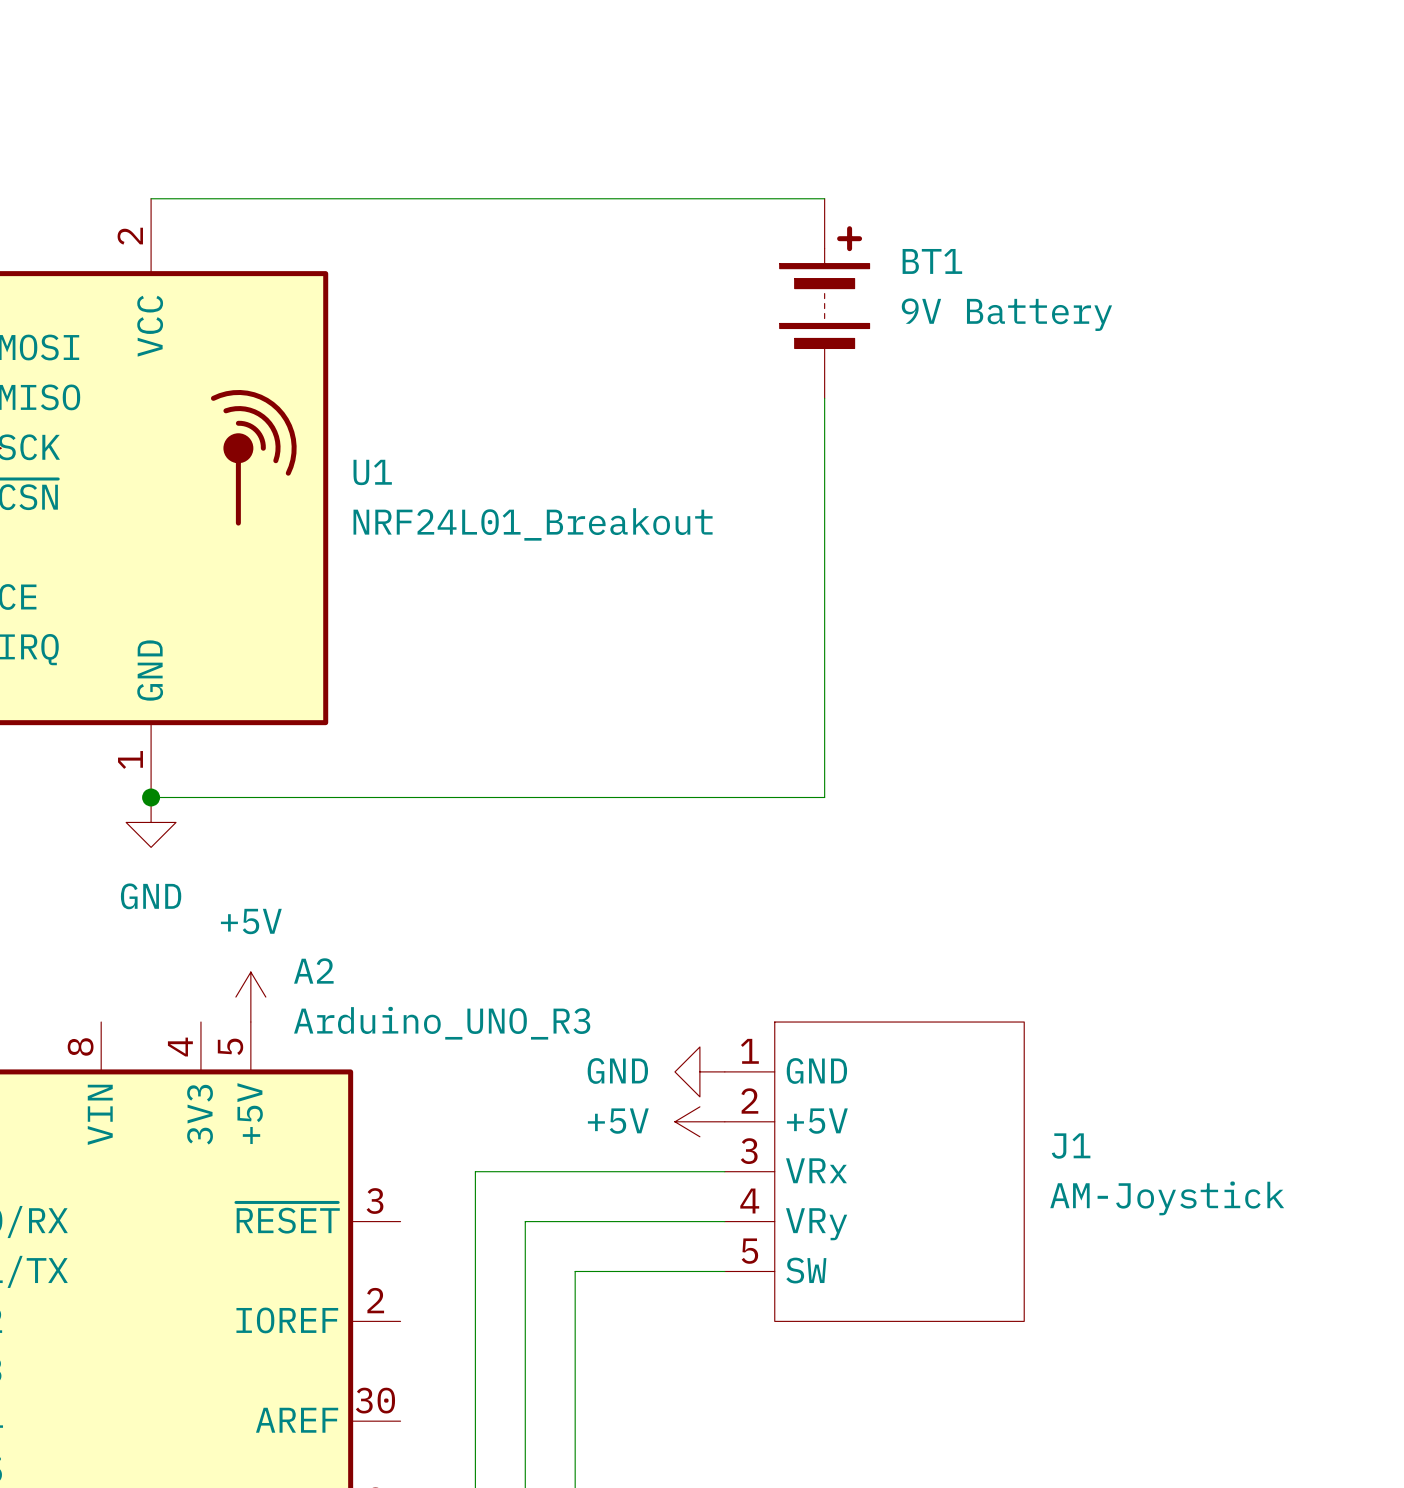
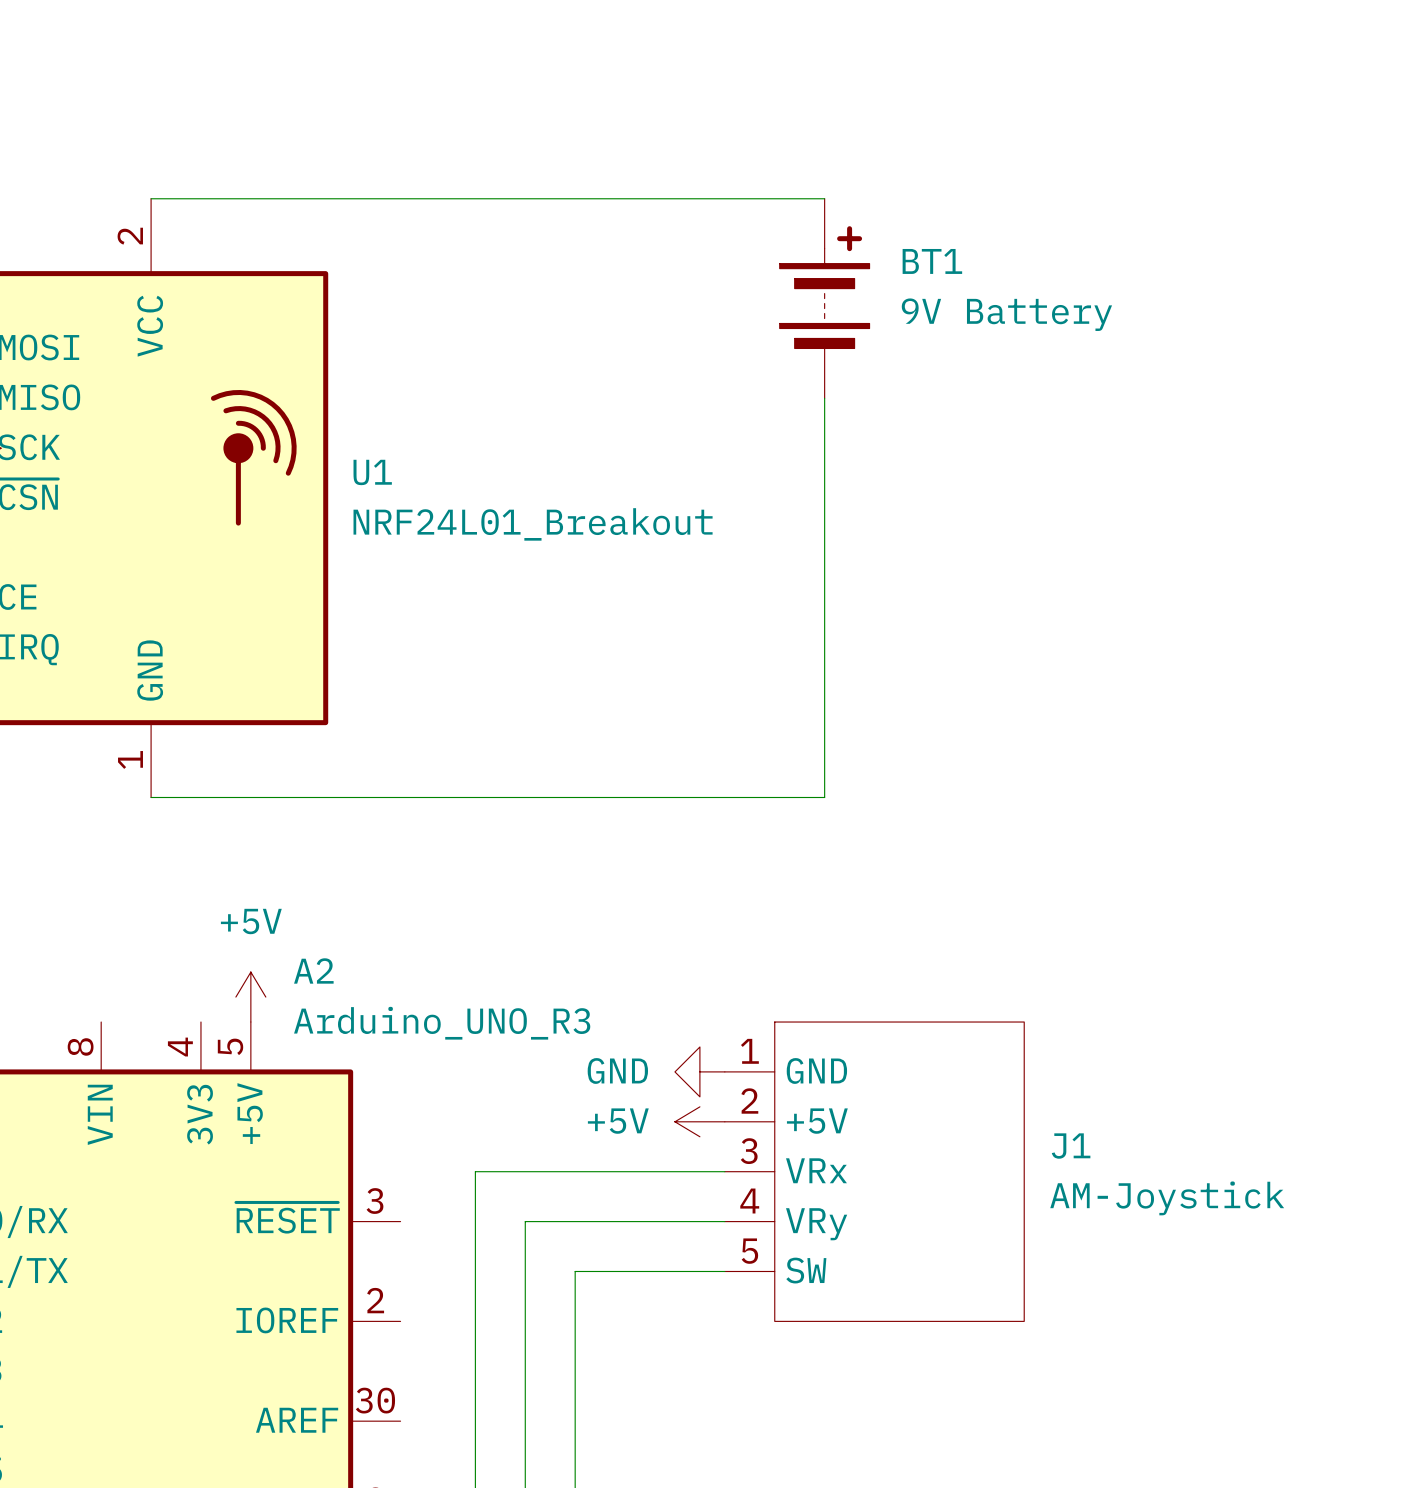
junction: (151, 797) -> none
power symbol: GND (151, 822) -> none

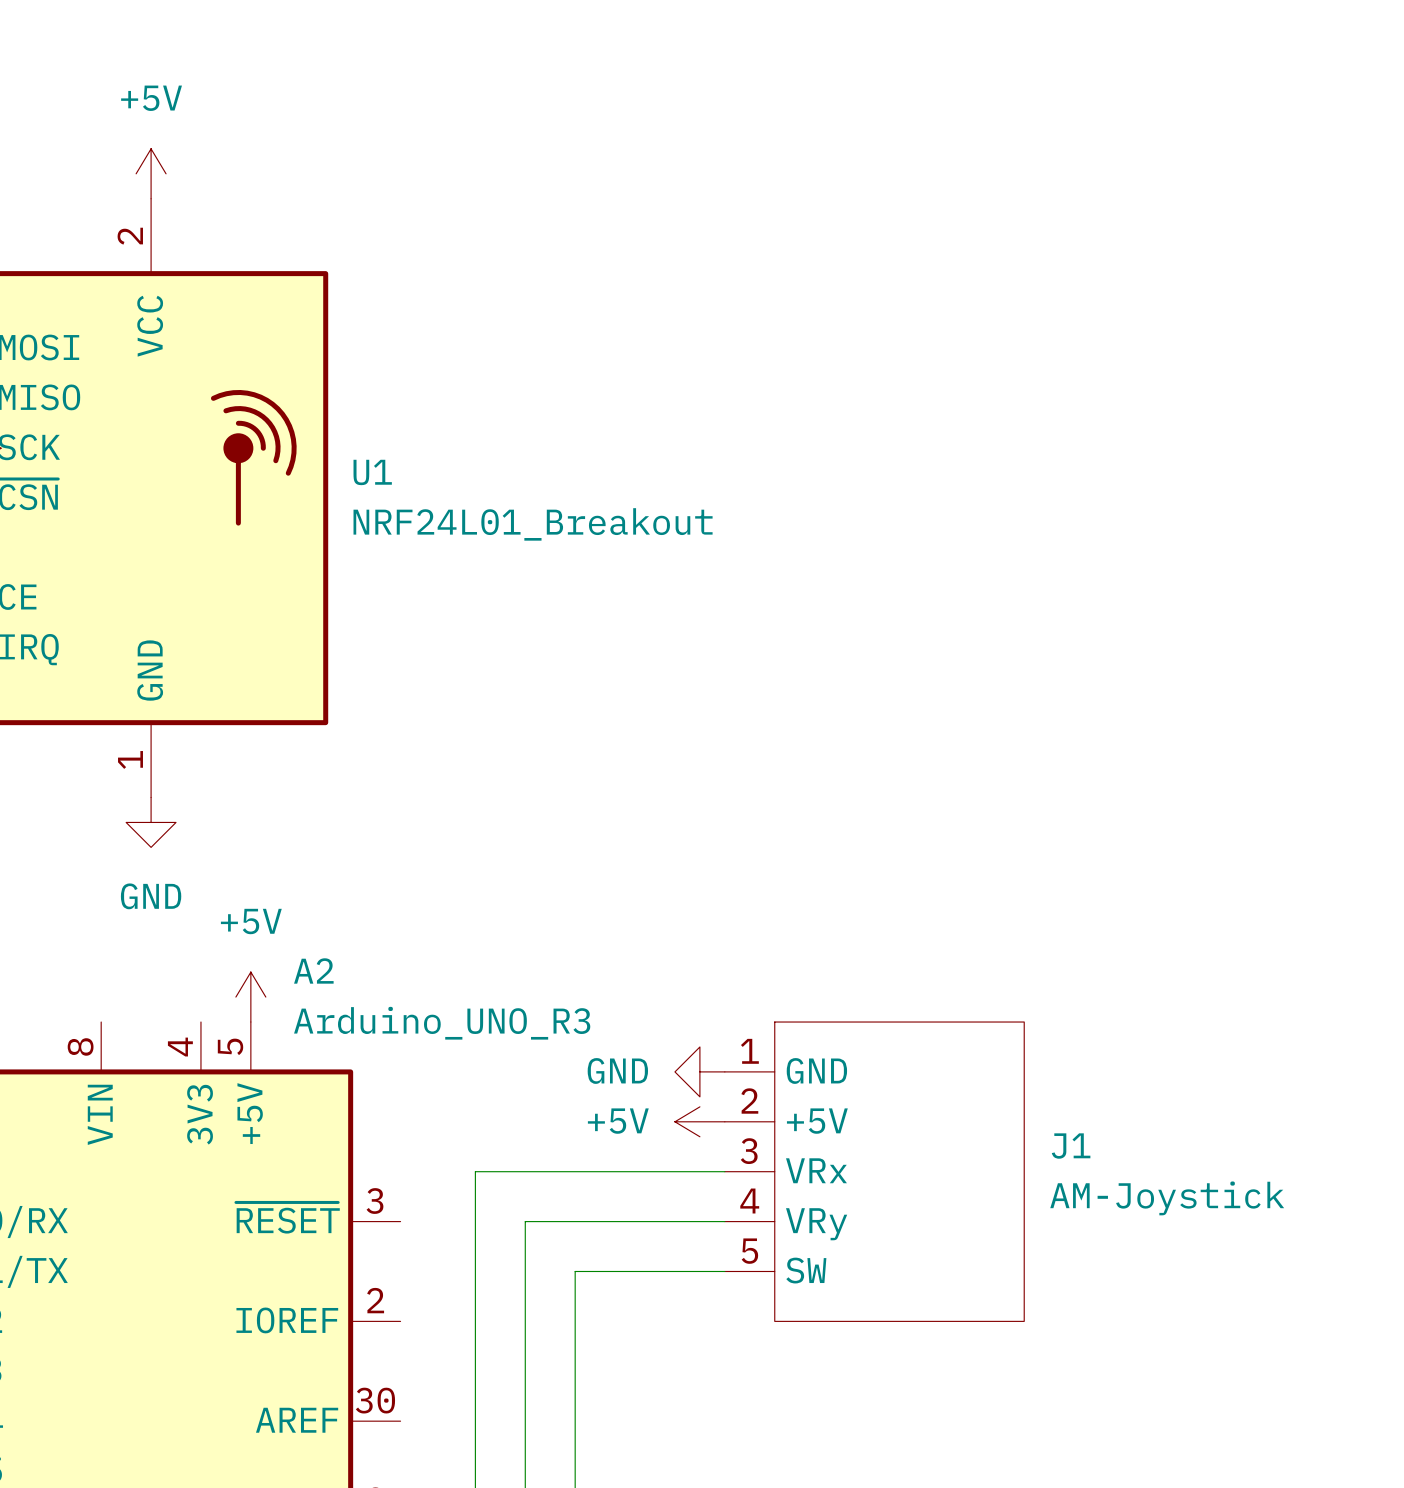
power symbol: none -> +5V (151, 173)
wire: (151, 198) (824, 198) -> none
BT1: 9V Battery (824, 298) -> none
wire: (824, 398) (824, 797) (151, 797) -> none
power symbol: none -> GND (151, 822)

